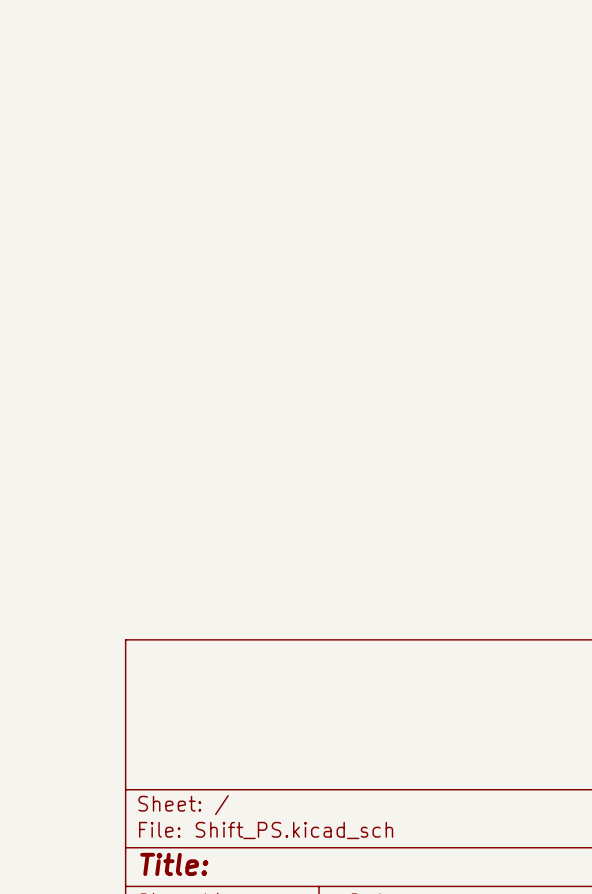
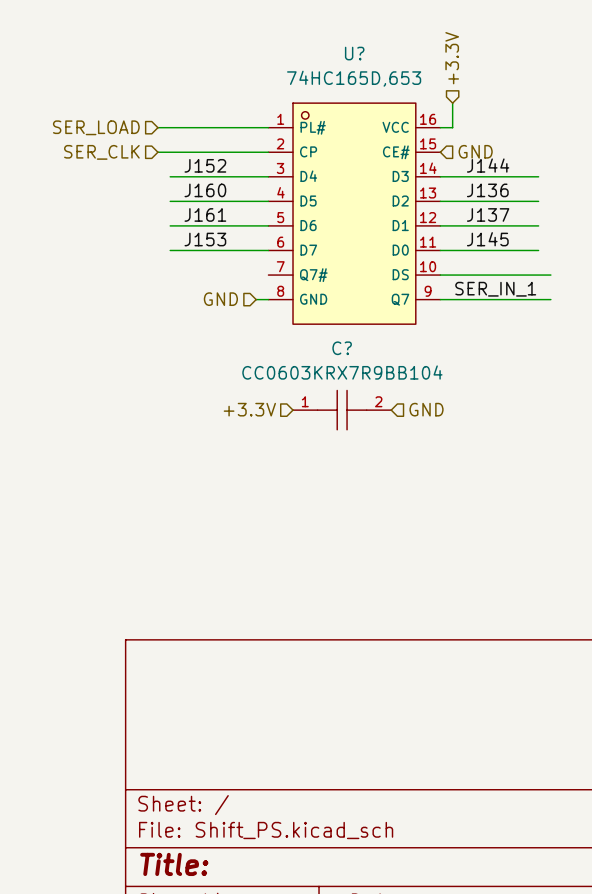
hierarchical label: none -> +3.3V (452, 58)
wire: none -> (452, 103) (452, 127) (440, 127)
hierarchical label: none -> SER_LOAD (96, 127)
wire: none -> (157, 127) (268, 127)
hierarchical label: none -> GND (475, 151)
hierarchical label: none -> SER_CLK (101, 152)
wire: none -> (157, 152) (268, 152)
label: none -> J152 (205, 165)
label: none -> J144 (488, 165)
wire: none -> (170, 176) (268, 176)
wire: none -> (440, 176) (538, 176)
label: none -> J160 (205, 190)
label: none -> J136 (487, 190)
wire: none -> (170, 201) (268, 201)
wire: none -> (440, 201) (538, 201)
U?: none -> 74HC165D,653 (354, 213)
label: none -> J161 (205, 214)
label: none -> J137 (488, 214)
wire: none -> (170, 225) (268, 225)
wire: none -> (440, 225) (538, 225)
label: none -> J153 (205, 239)
label: none -> J145 (487, 239)
wire: none -> (170, 250) (268, 250)
wire: none -> (440, 250) (538, 250)
wire: none -> (440, 275) (550, 275)
label: none -> SER_IN_1 (495, 289)
hierarchical label: none -> GND (220, 299)
wire: none -> (256, 299) (268, 299)
wire: none -> (440, 299) (550, 299)
hierarchical label: none -> +3.3V (249, 409)
hierarchical label: none -> GND (426, 409)
C?: none -> CC0603KRX7R9BB104 (342, 410)

